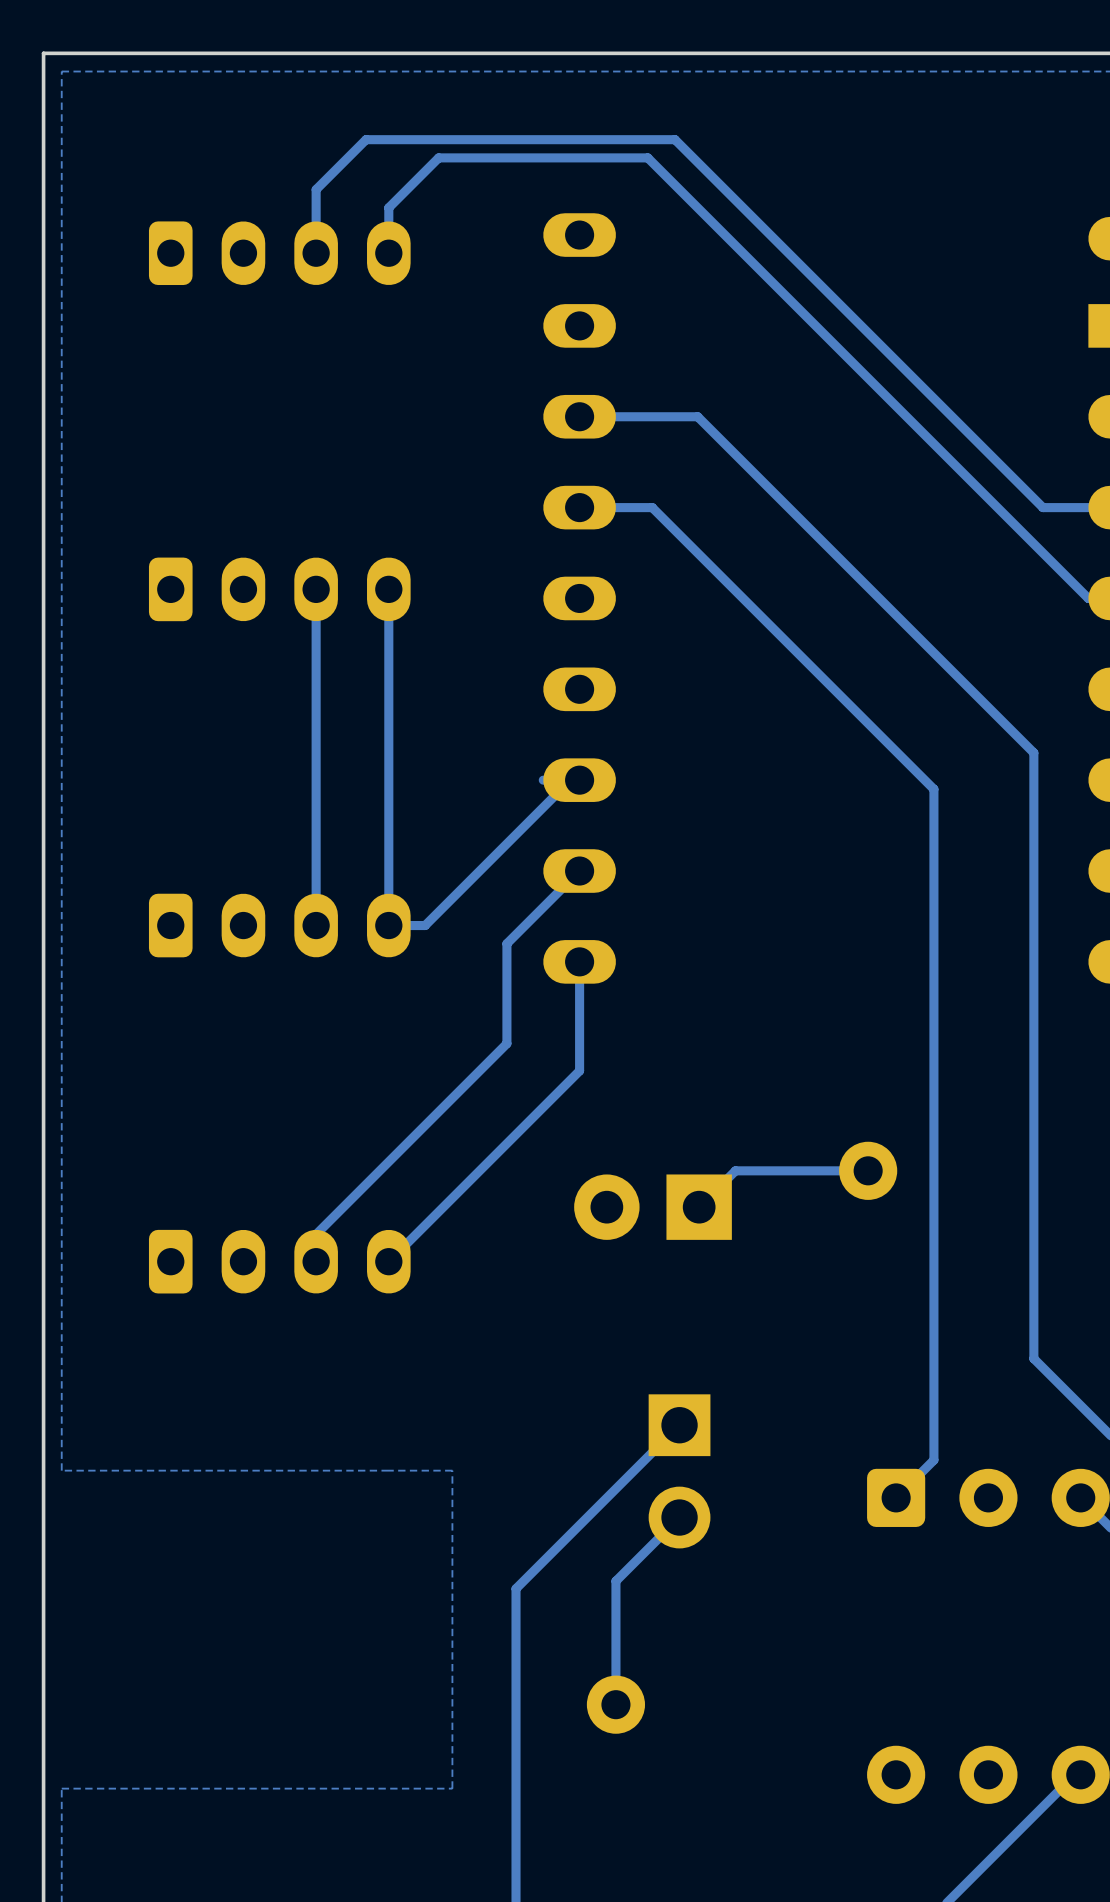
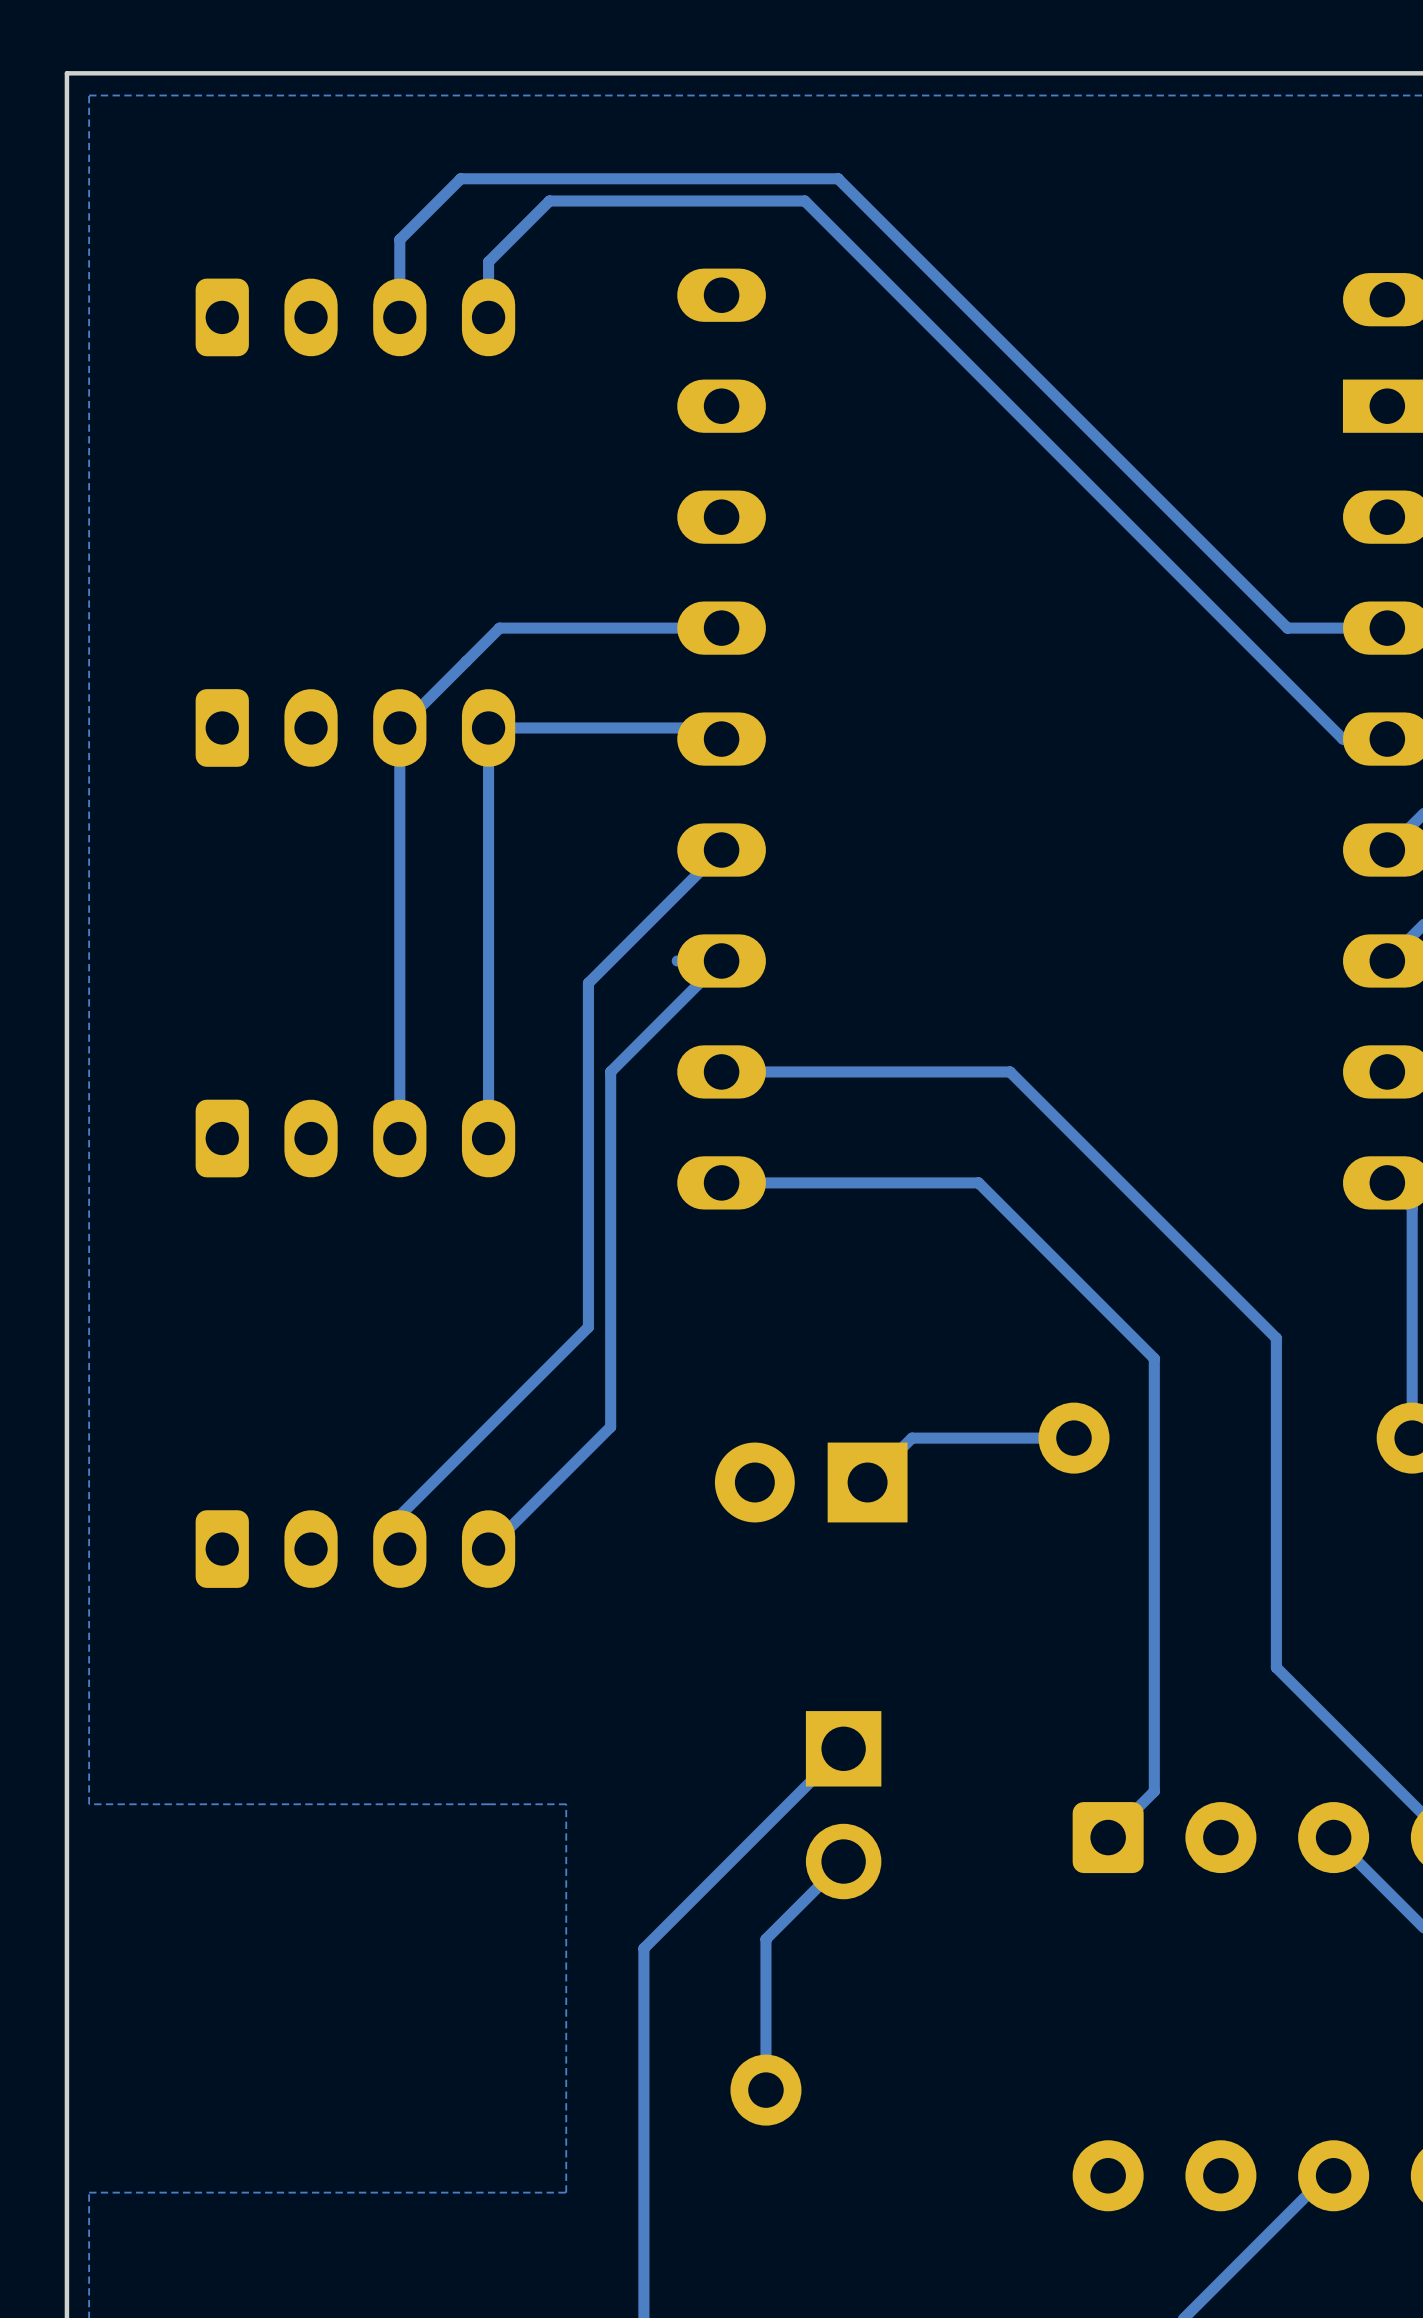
track: (579, 416) (697, 416) (1033, 752) (1033, 1089) -> (721, 1071) (1010, 1071) (1276, 1338)
track: (579, 507) (652, 507) (933, 789) (933, 1105) -> (721, 1182) (978, 1182) (1154, 1358)
track: none -> (721, 628) (499, 628) (399, 727)
track: none -> (710, 727) (488, 727)
track: (570, 780) (425, 925) (388, 925) -> none
track: (579, 871) (506, 943) (506, 1043) (470, 1079) -> (721, 850) (588, 983) (588, 1327)
track: (579, 961) (579, 1070) (488, 1161) -> (721, 960) (610, 1071) (610, 1426)

